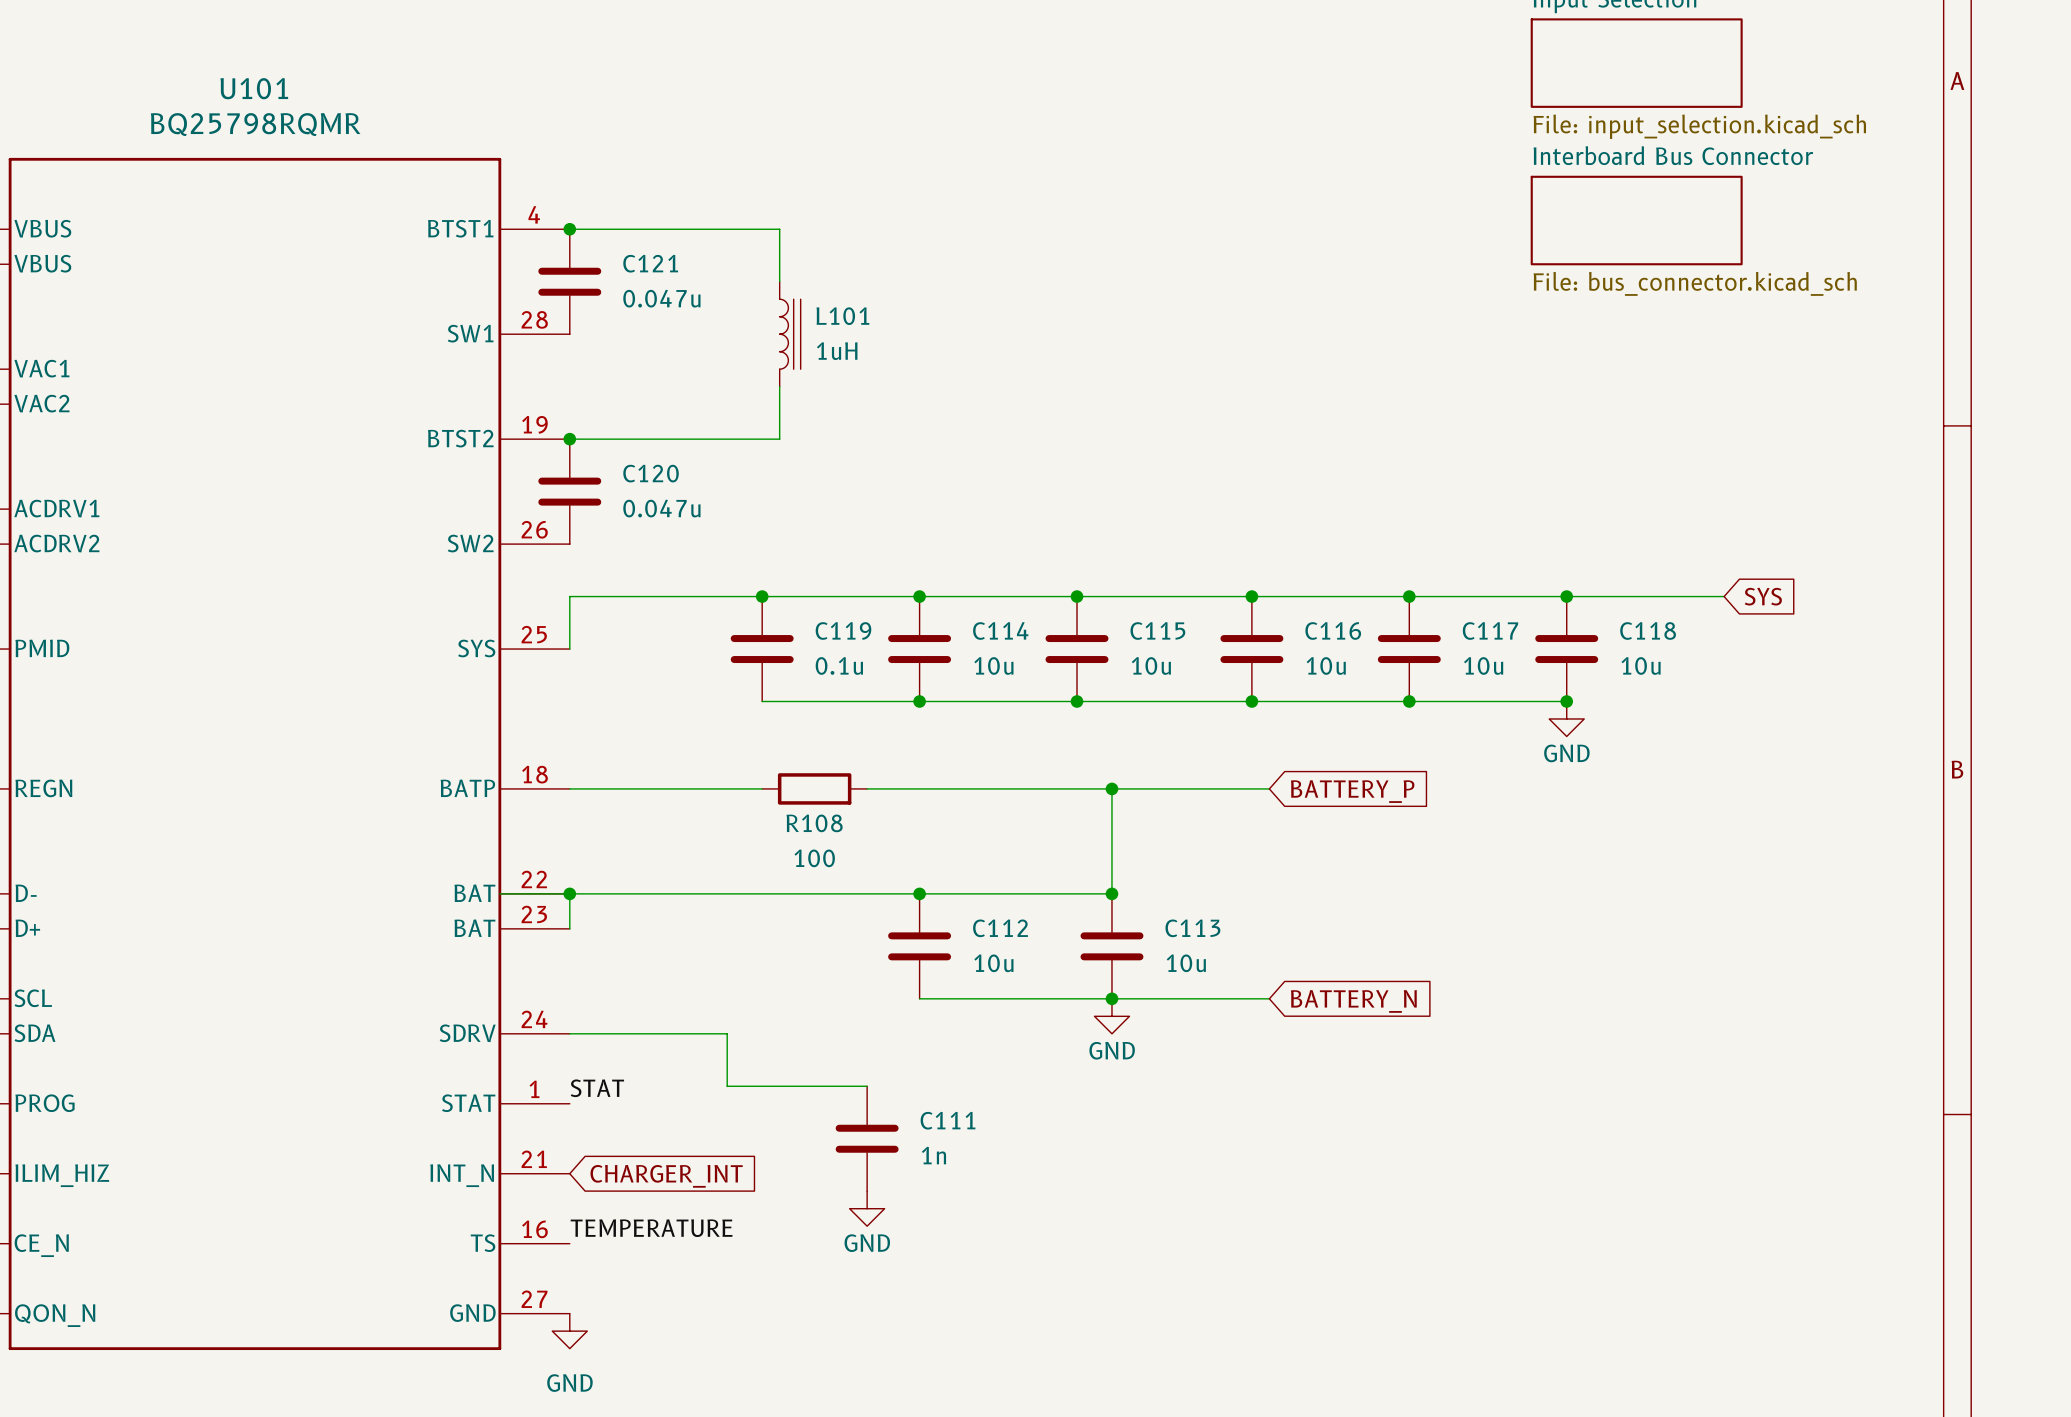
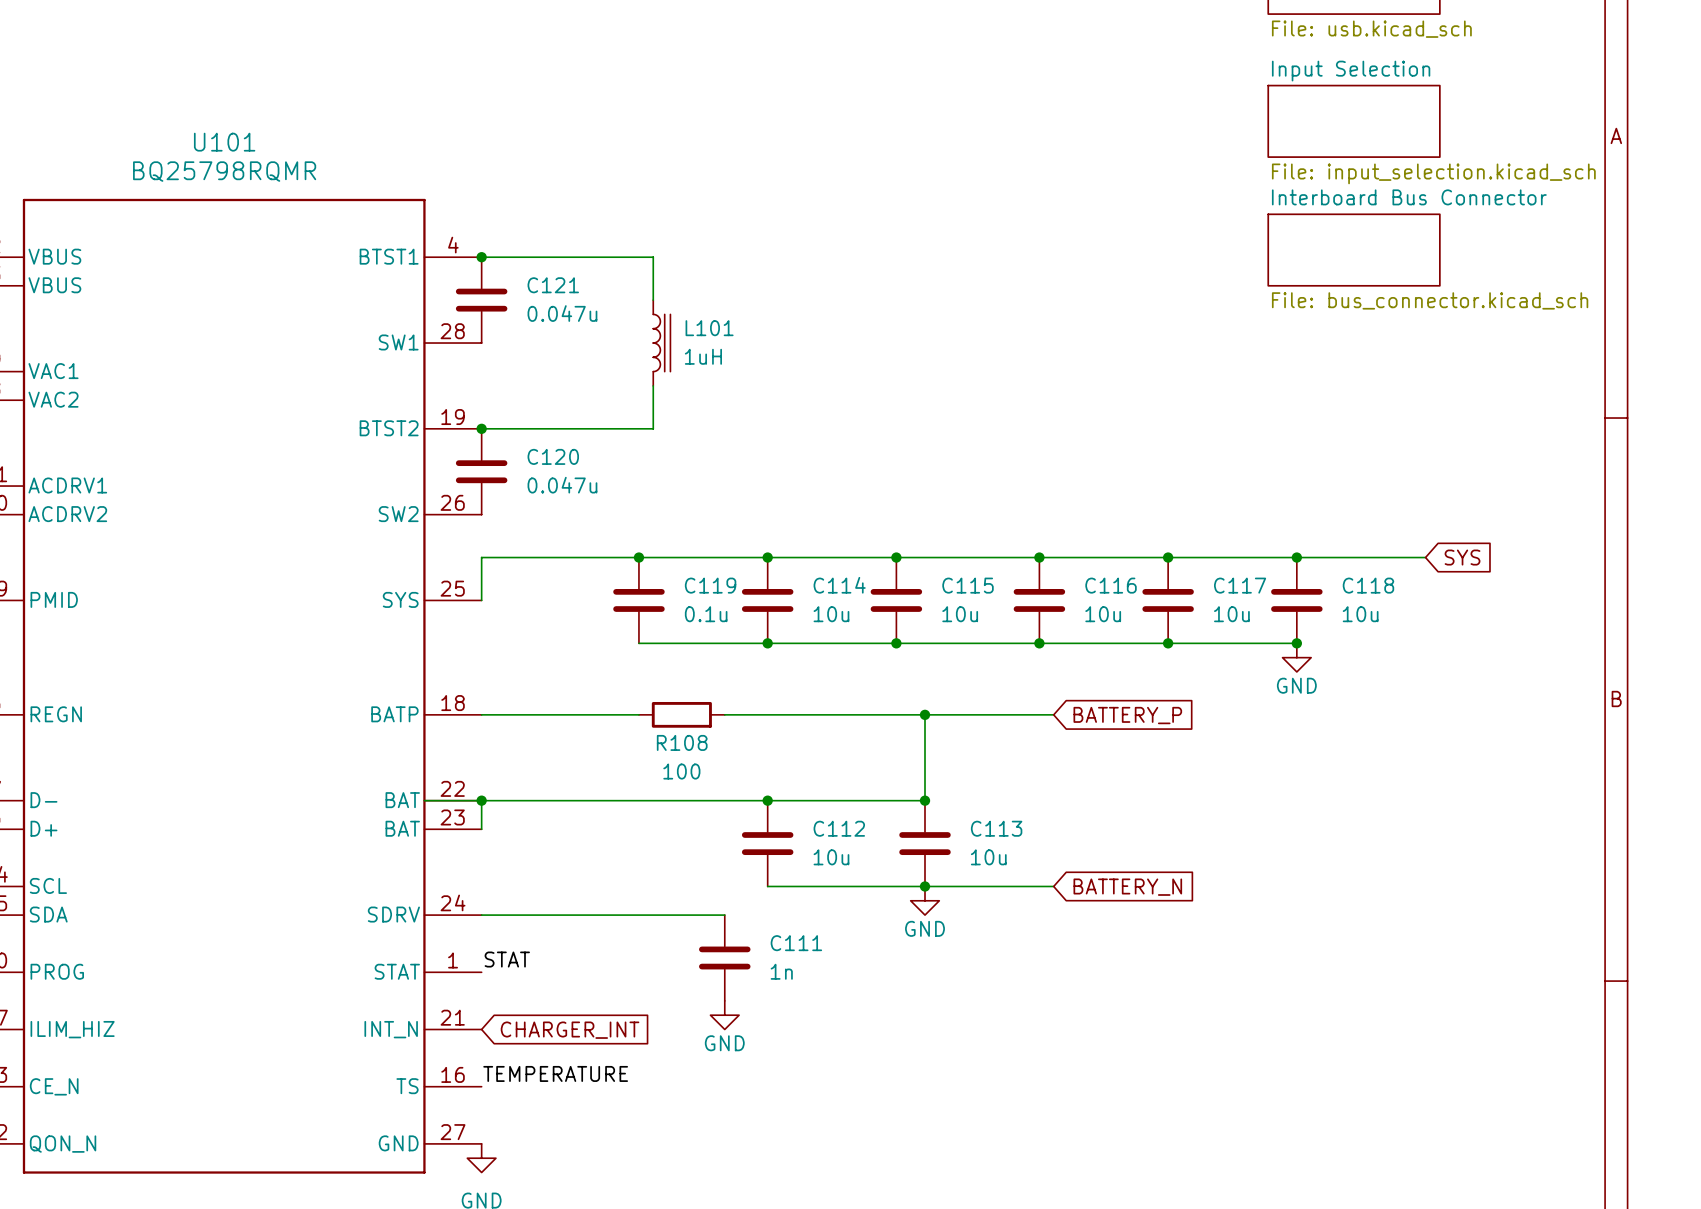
wire: (727, 1033) (727, 1086) (867, 1086) -> (610, 915) (724, 915)
C111 position: (867, 1138) -> (724, 957)
power symbol position: GND (867, 1208) -> GND (724, 1015)

